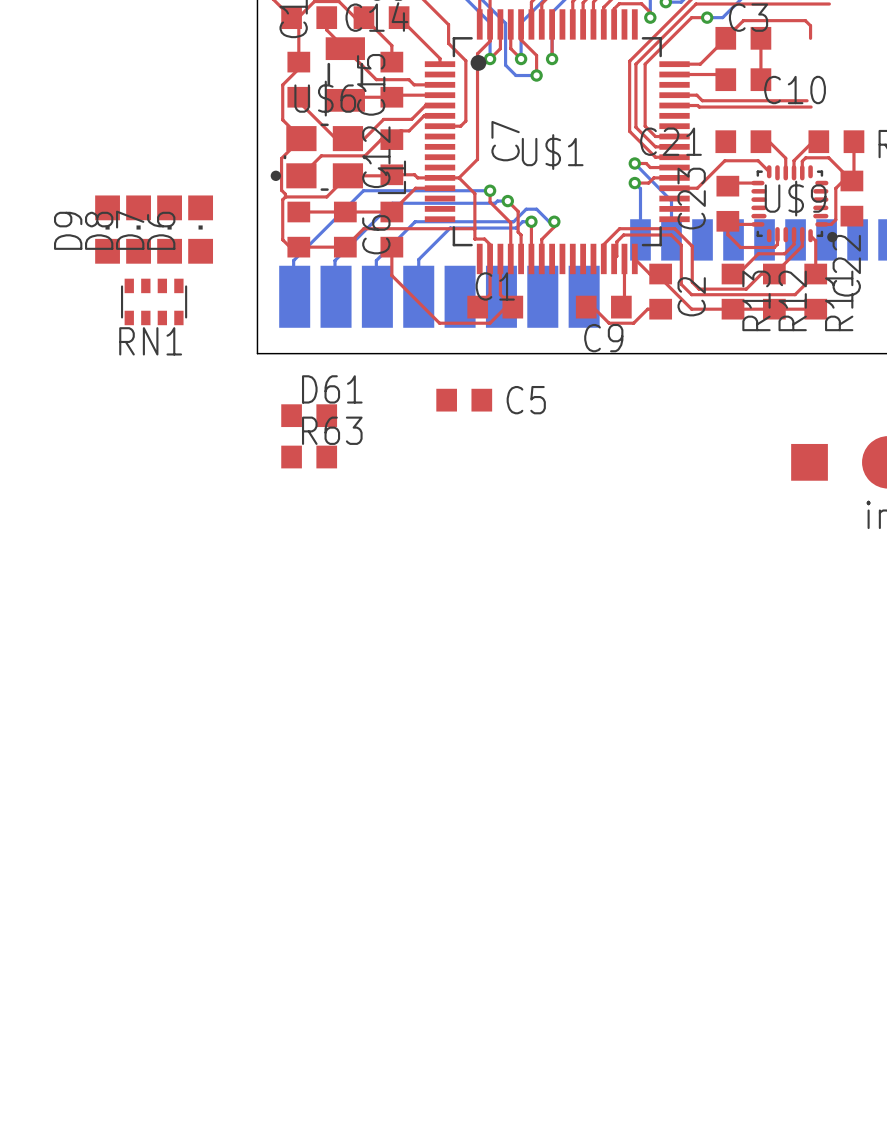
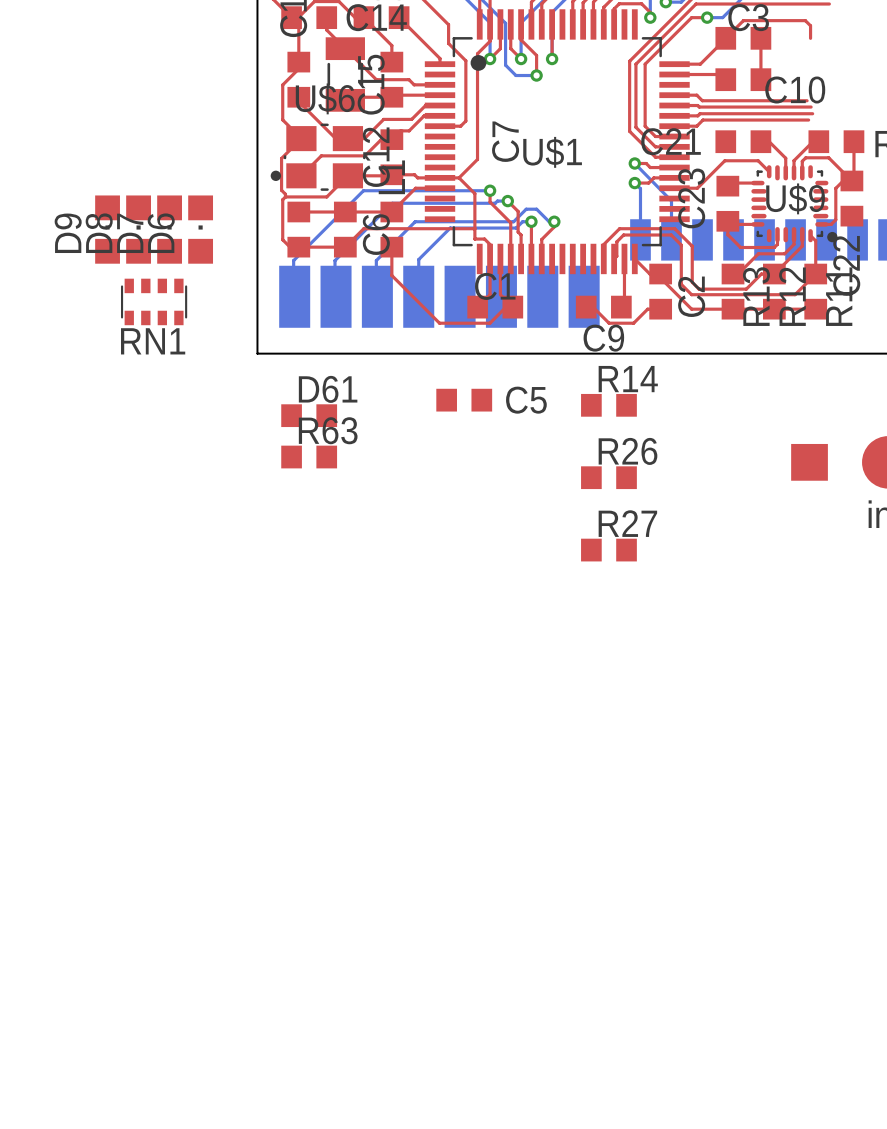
top track: none -> (812, 113) (699, 113) (697, 115) (674, 115)
top track: none -> (808, 120) (702, 120) (696, 126) (674, 126)
R14: none -> (608, 405)
R26: none -> (608, 477)
R27: none -> (608, 550)

